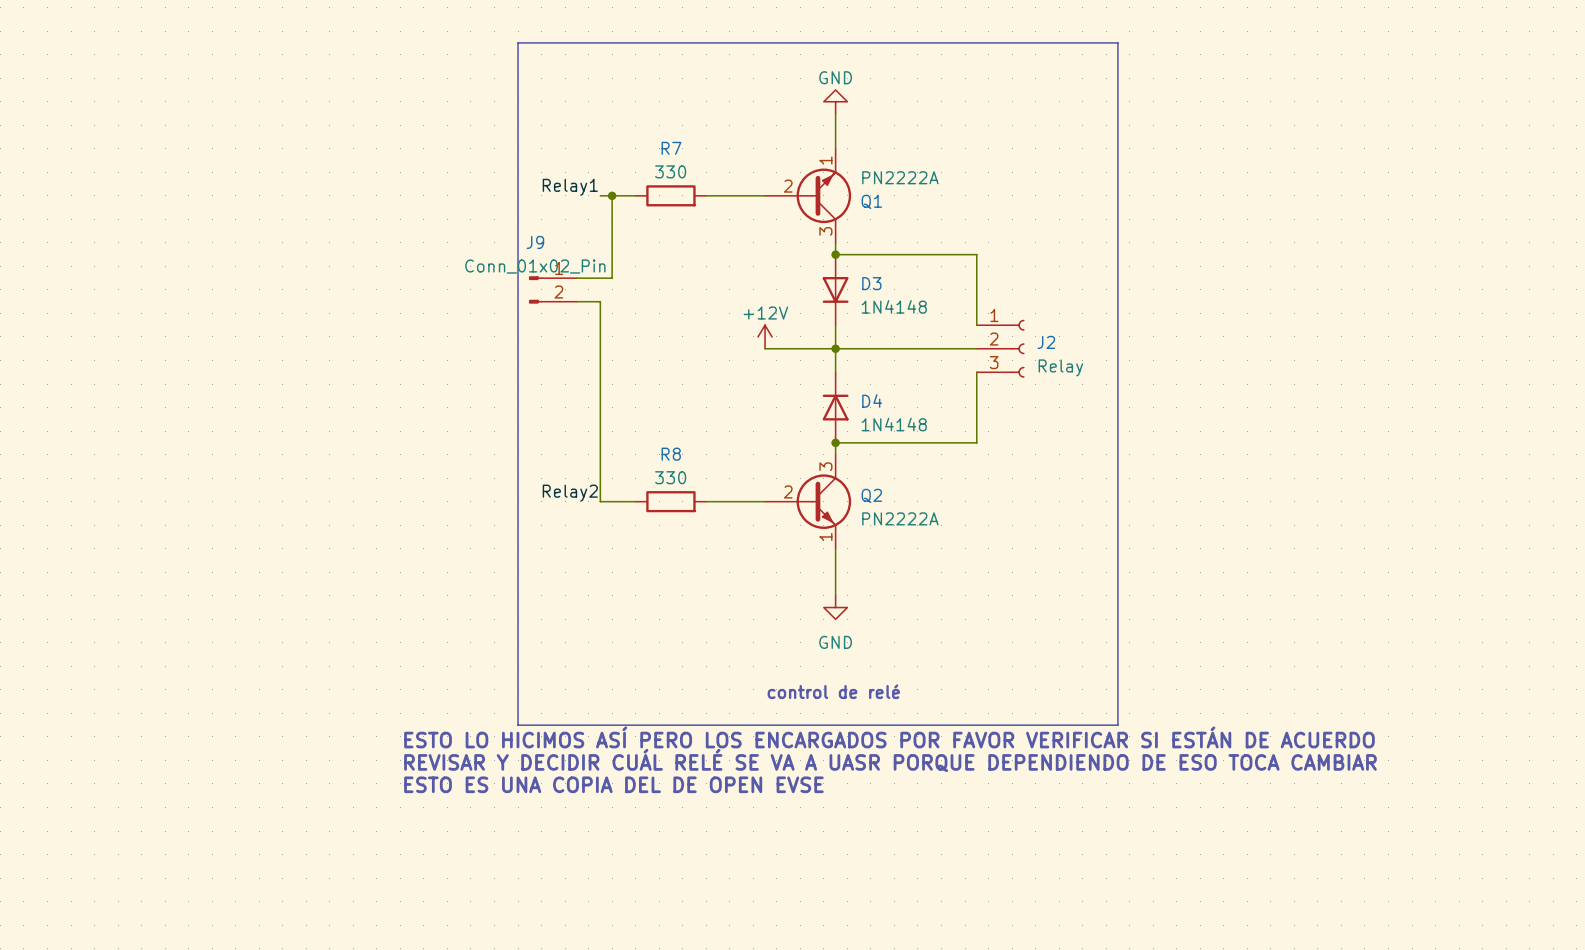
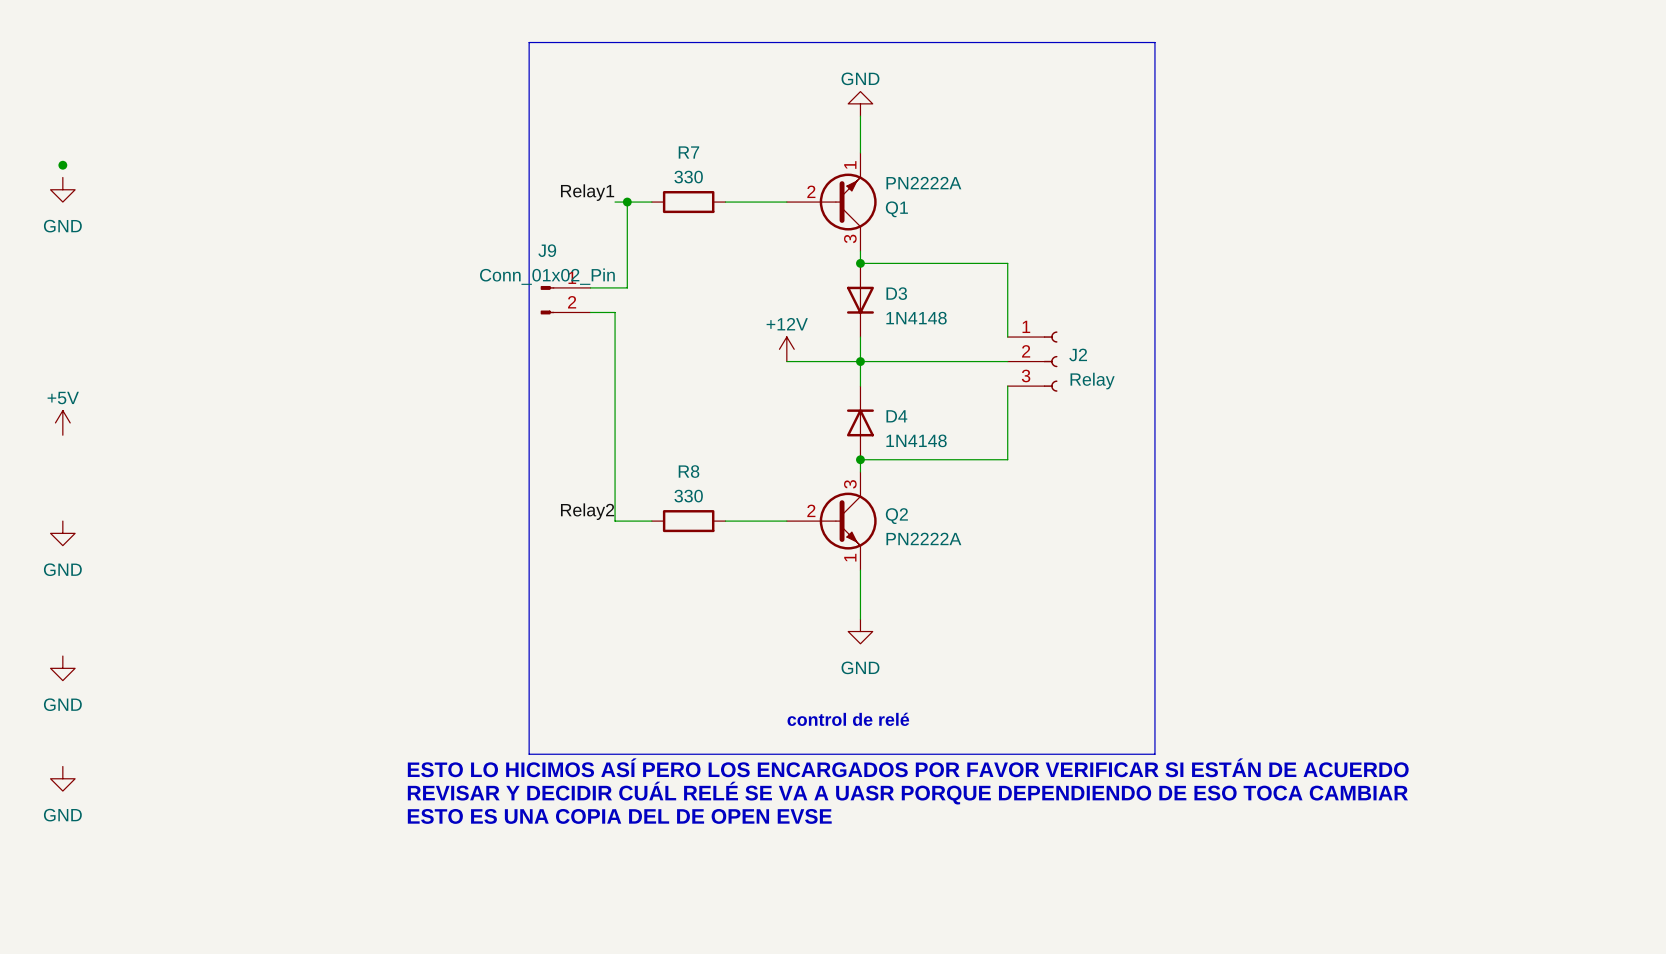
junction: none -> (62, 165)
power symbol: none -> GND (62, 189)
power symbol: none -> +5V (62, 422)
power symbol: none -> GND (62, 533)
power symbol: none -> GND (62, 668)
power symbol: none -> GND (62, 778)

